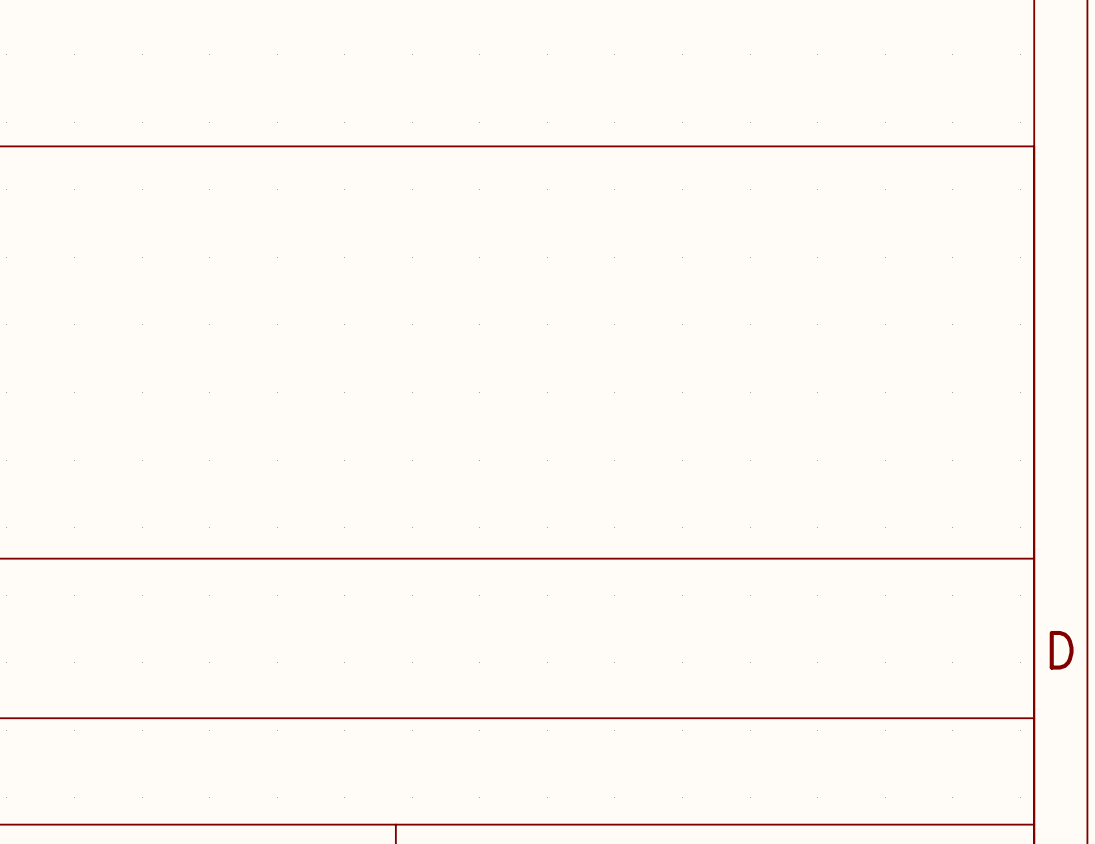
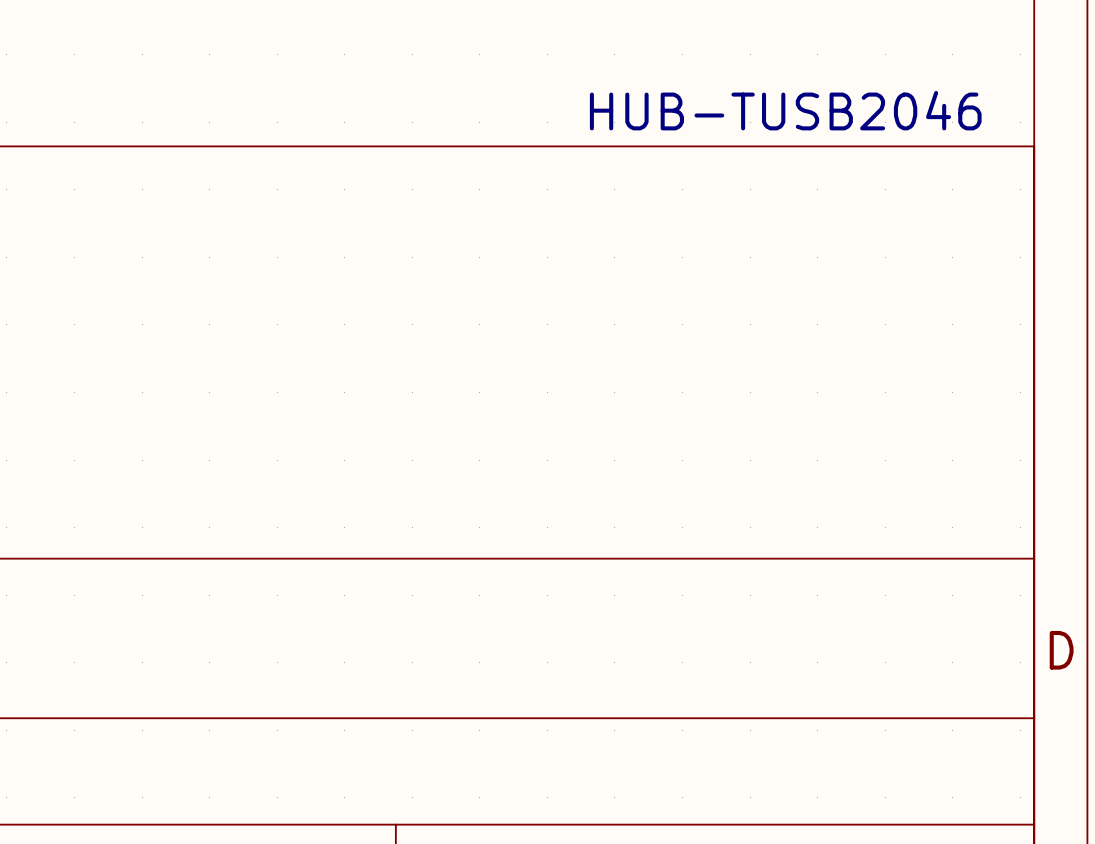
text: none -> HUB-TUSB2046 (785, 110)

